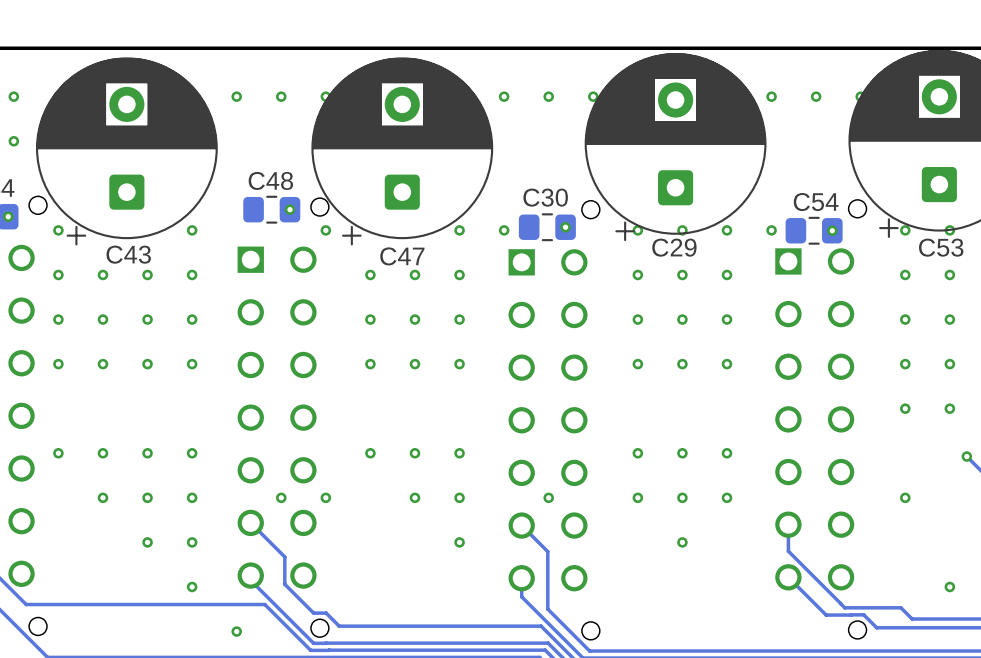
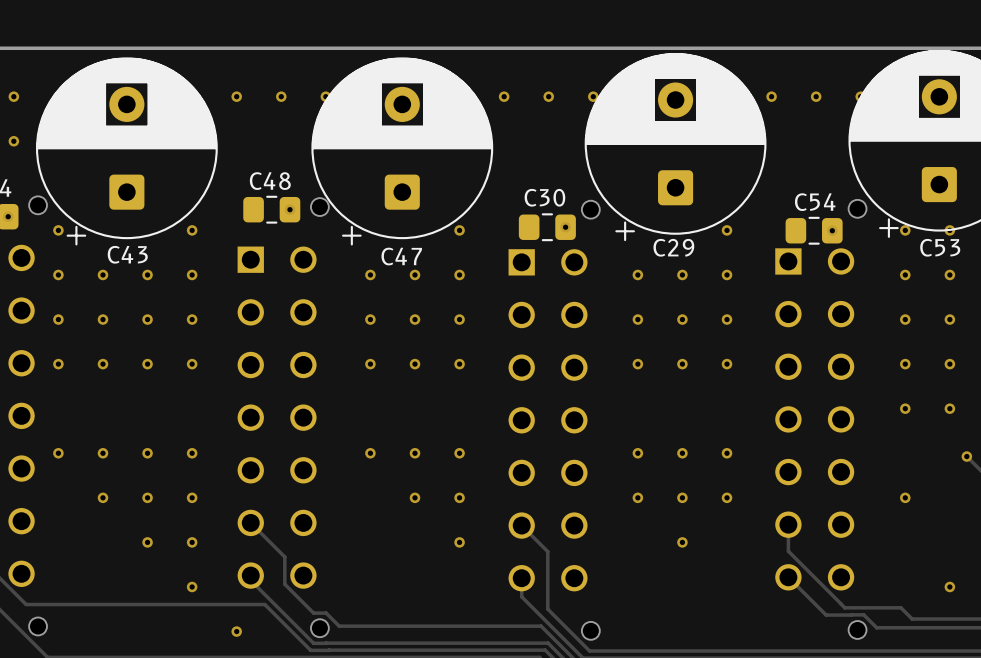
via: (325, 230) -> none
via: (504, 230) -> none
via: (637, 230) -> none
via: (682, 230) -> none
via: (771, 230) -> none
via: (281, 497) -> none
via: (325, 497) -> none
via: (548, 497) -> none

